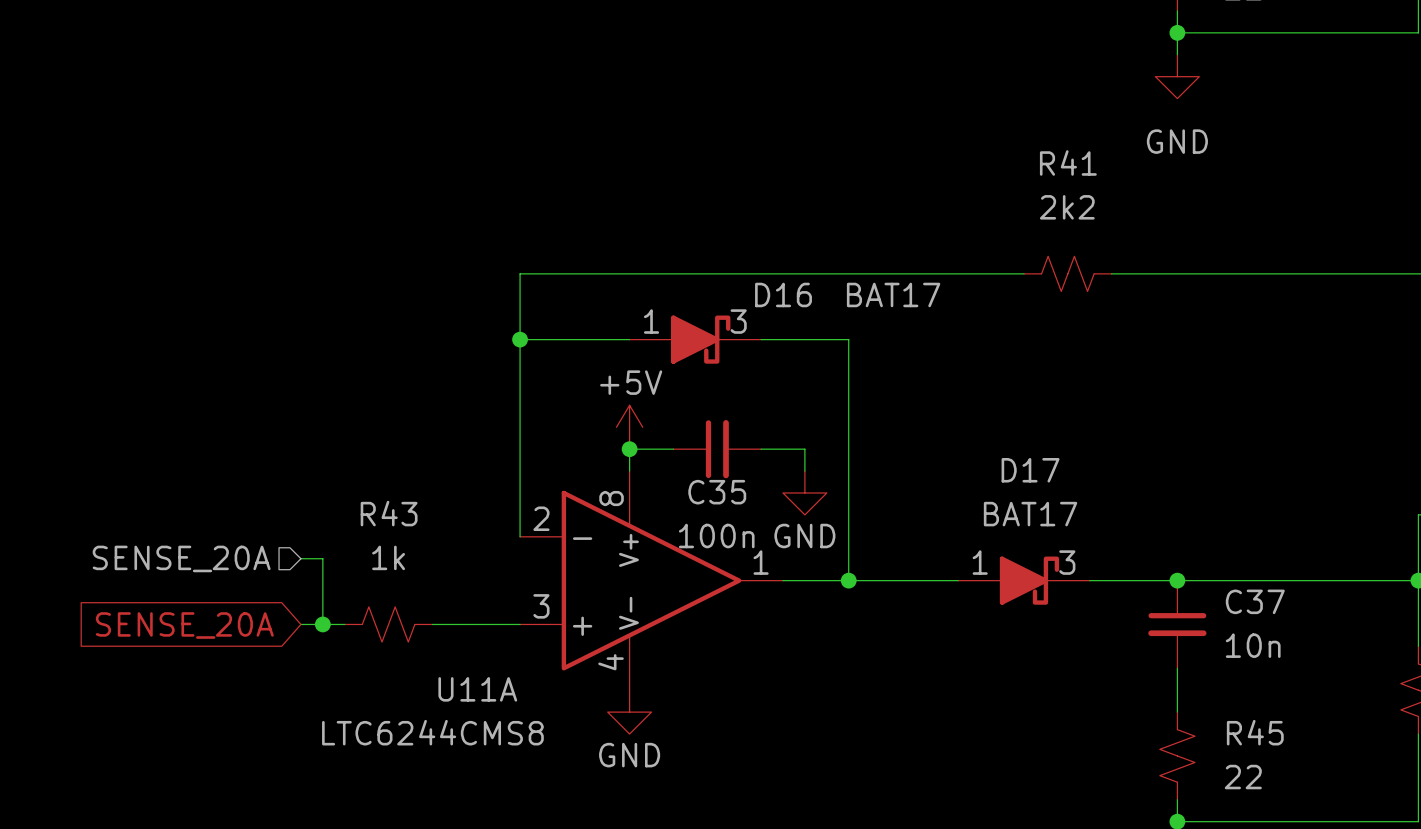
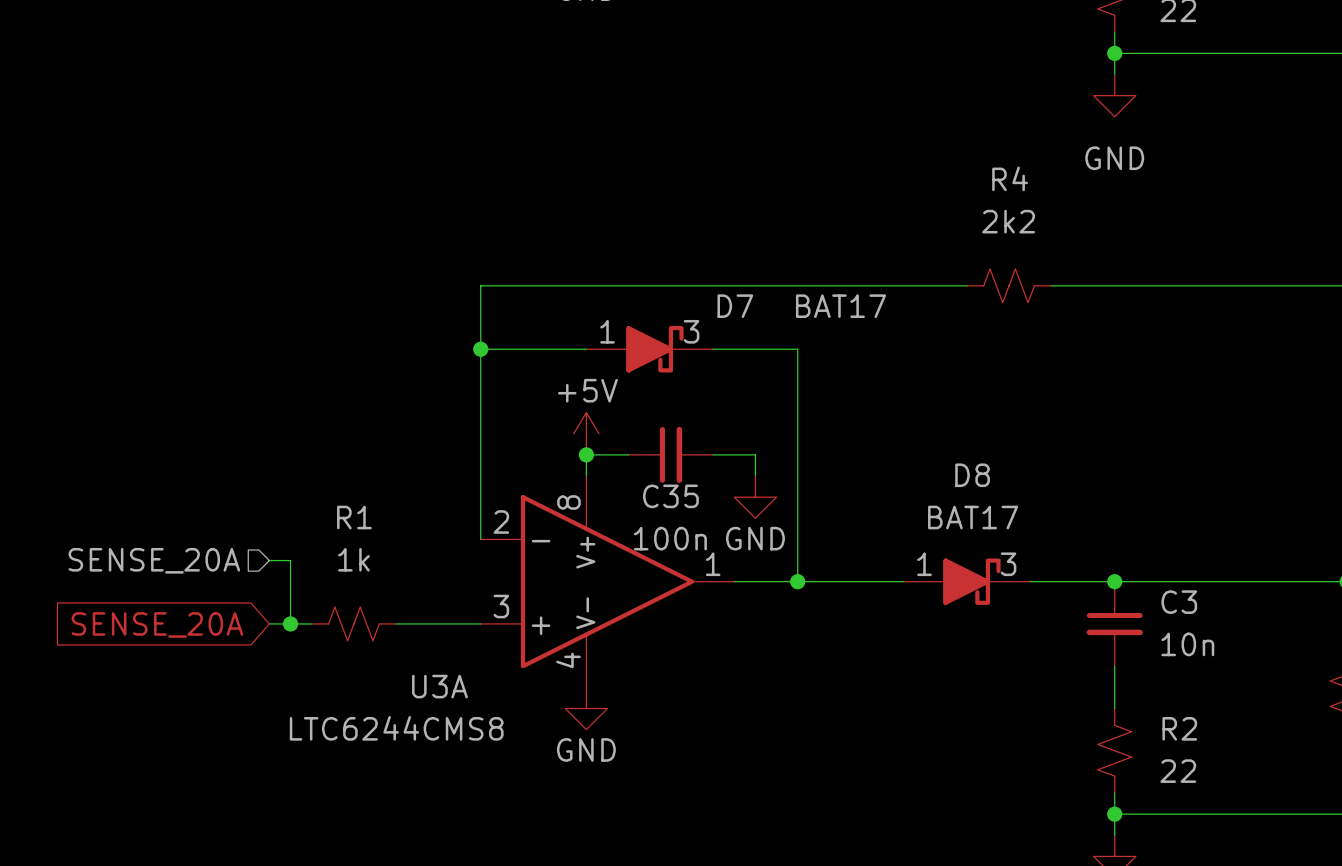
R41 name: R41 (1068, 162) -> R4 (1010, 178)
D16 name: D16 (783, 294) -> D7 (735, 306)
D17 name: D17 (1030, 470) -> D8 (972, 475)
R43 name: R43 (389, 513) -> R1 (354, 517)
C37 name: C37 (1255, 601) -> C3 (1179, 602)
U11A name: U11A (477, 689) -> U3A (439, 686)
R45 name: R45 (1255, 732) -> R2 (1179, 728)

